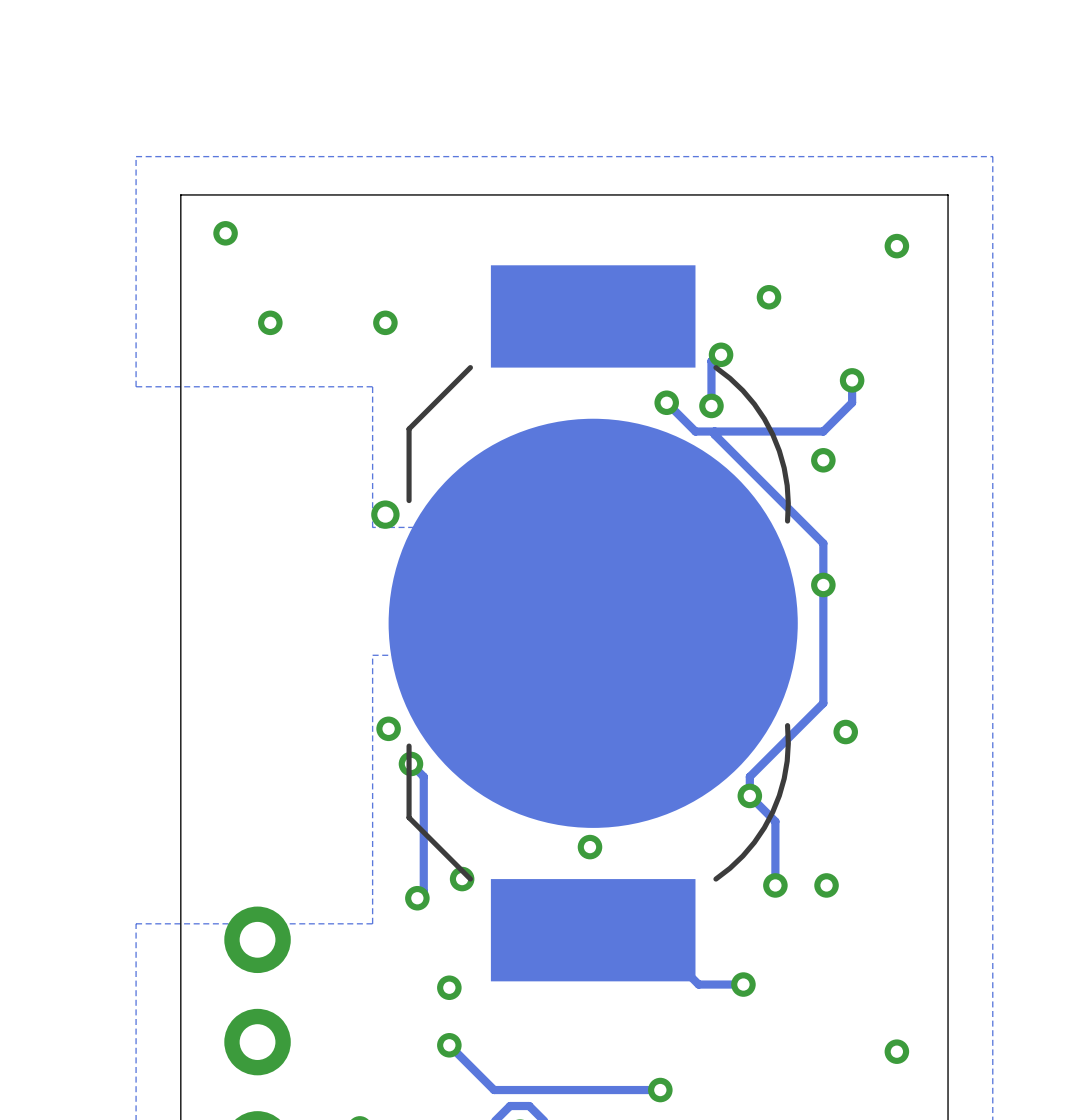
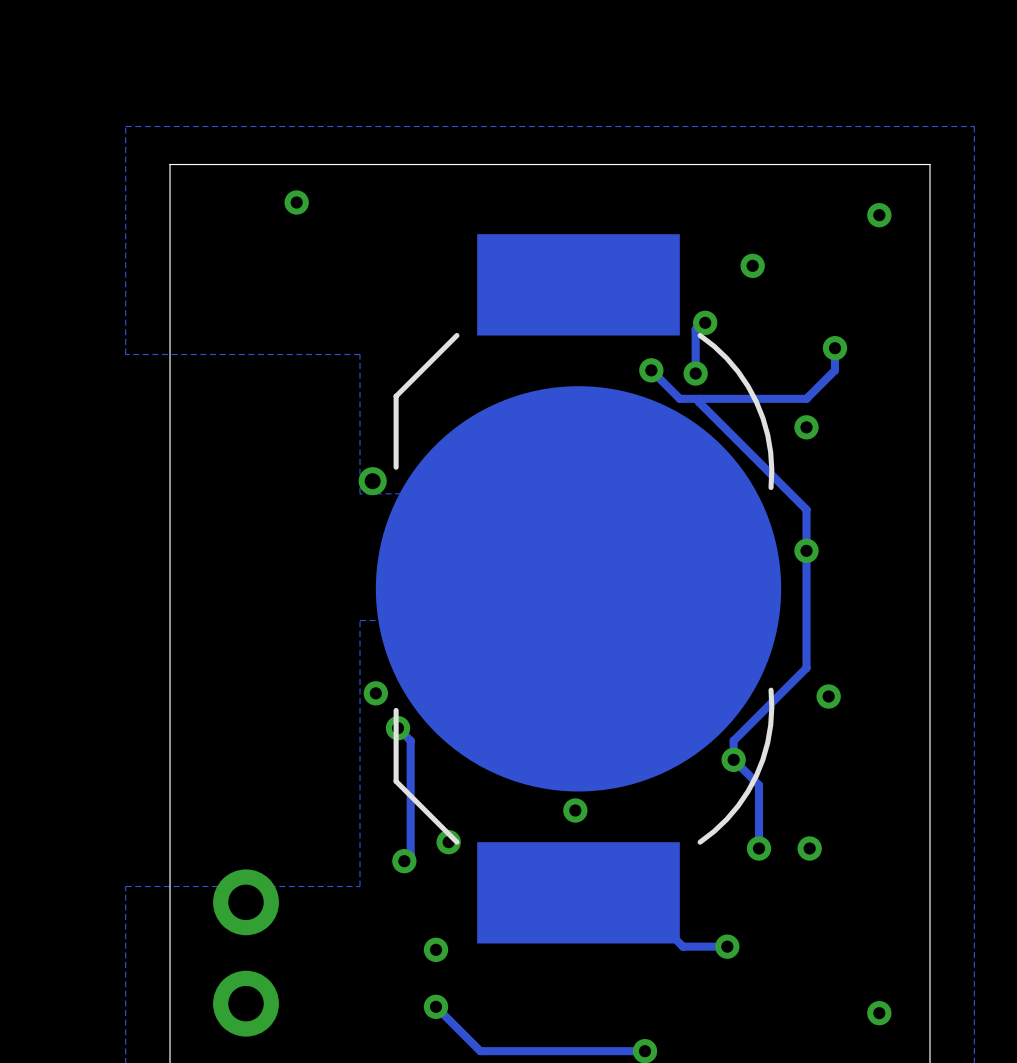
via: (225, 233) -> none
via: none -> (296, 202)
via: (270, 322) -> none
via: (385, 322) -> none

